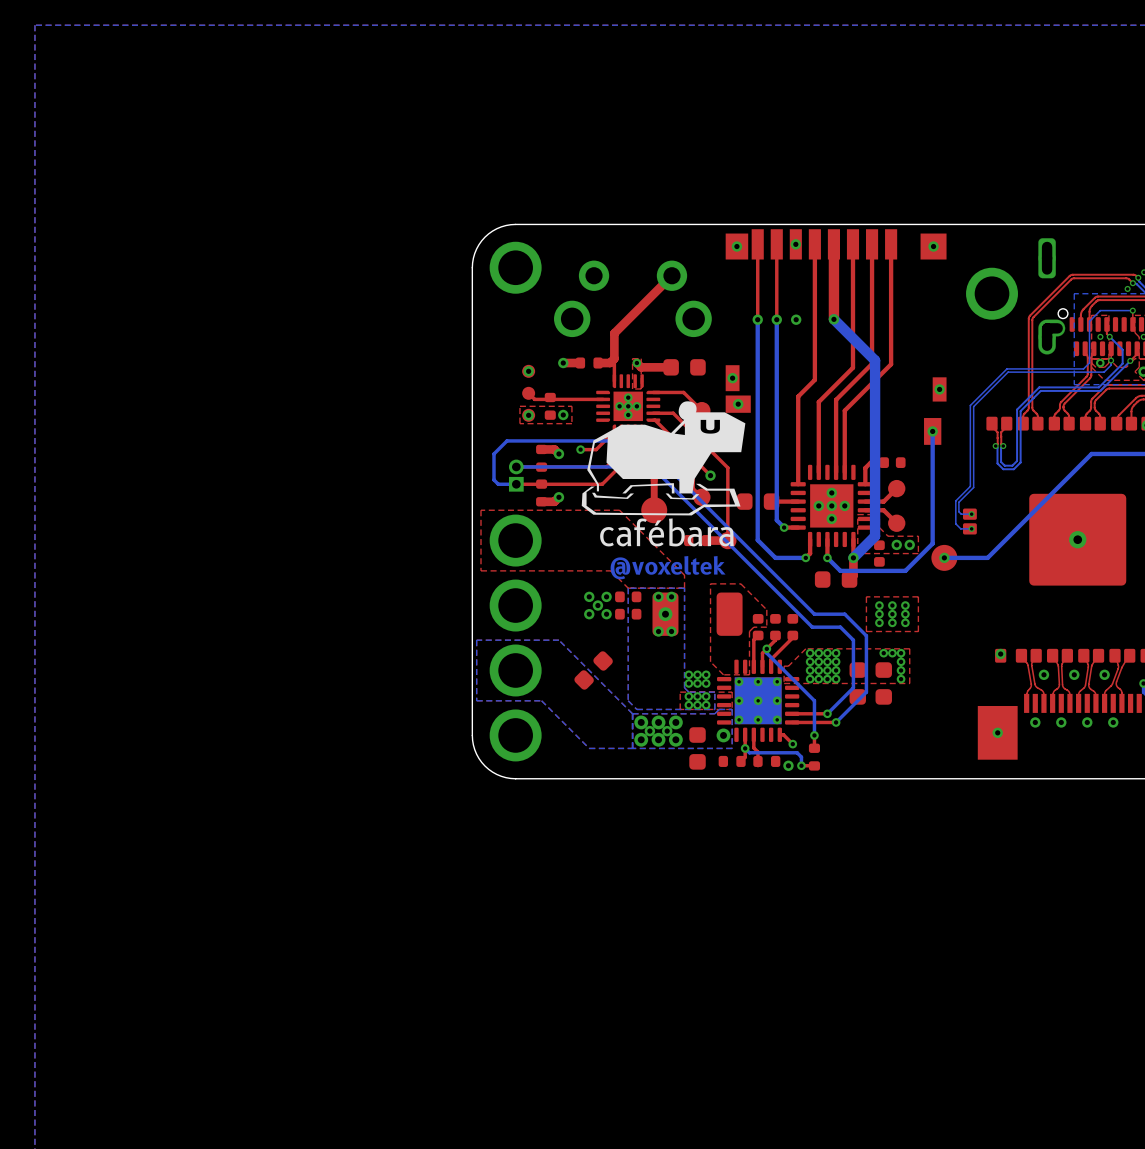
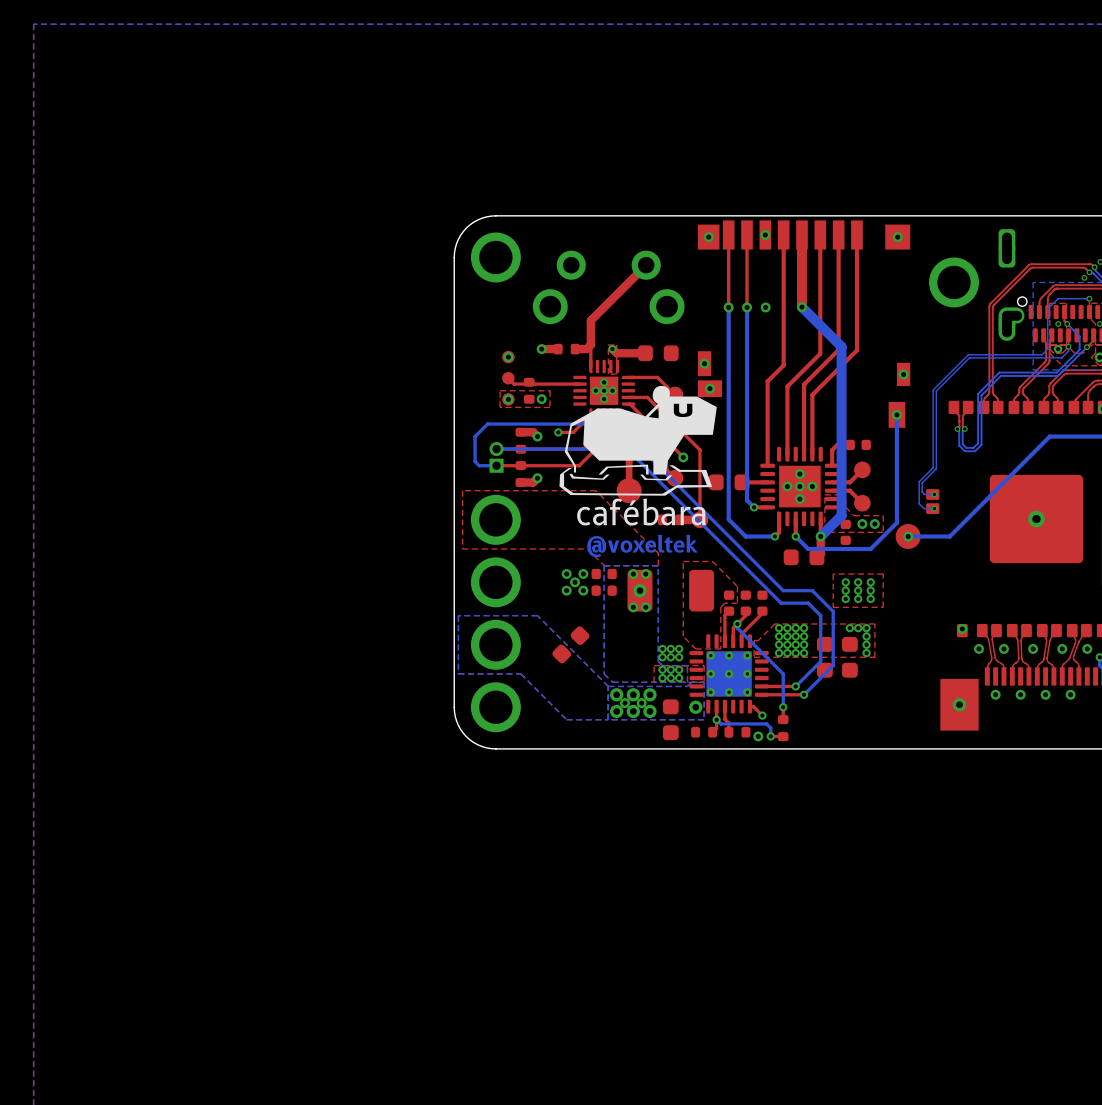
via: none -> (1087, 648)
via position: (997, 732) -> (978, 648)
via: none -> (959, 704)

